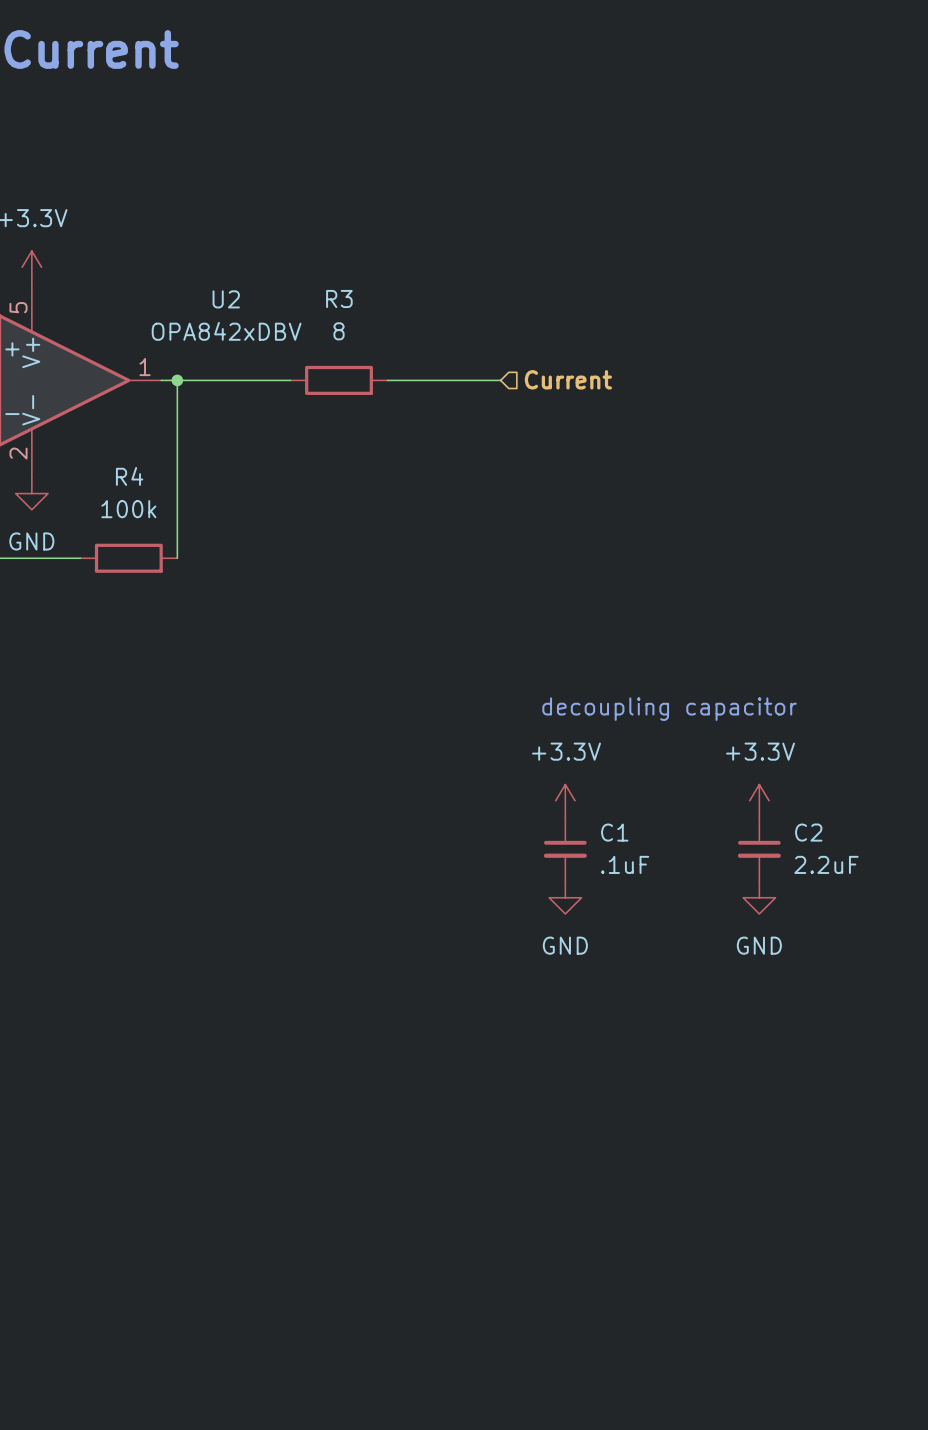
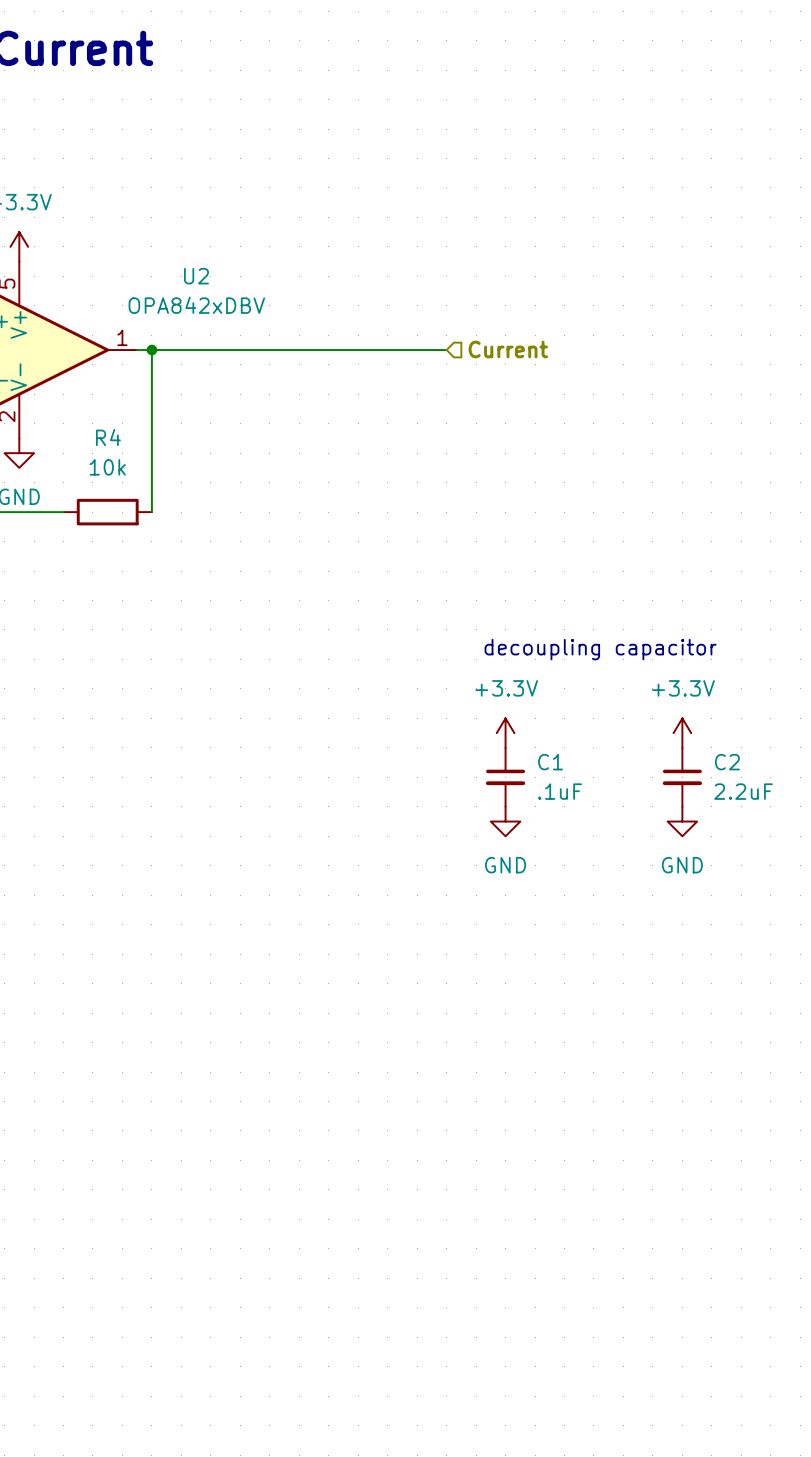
wire: none -> (255, 350) (343, 350)
R3: 8 (339, 380) -> none
R4 value: 100k (128, 509) -> 10k (107, 467)

